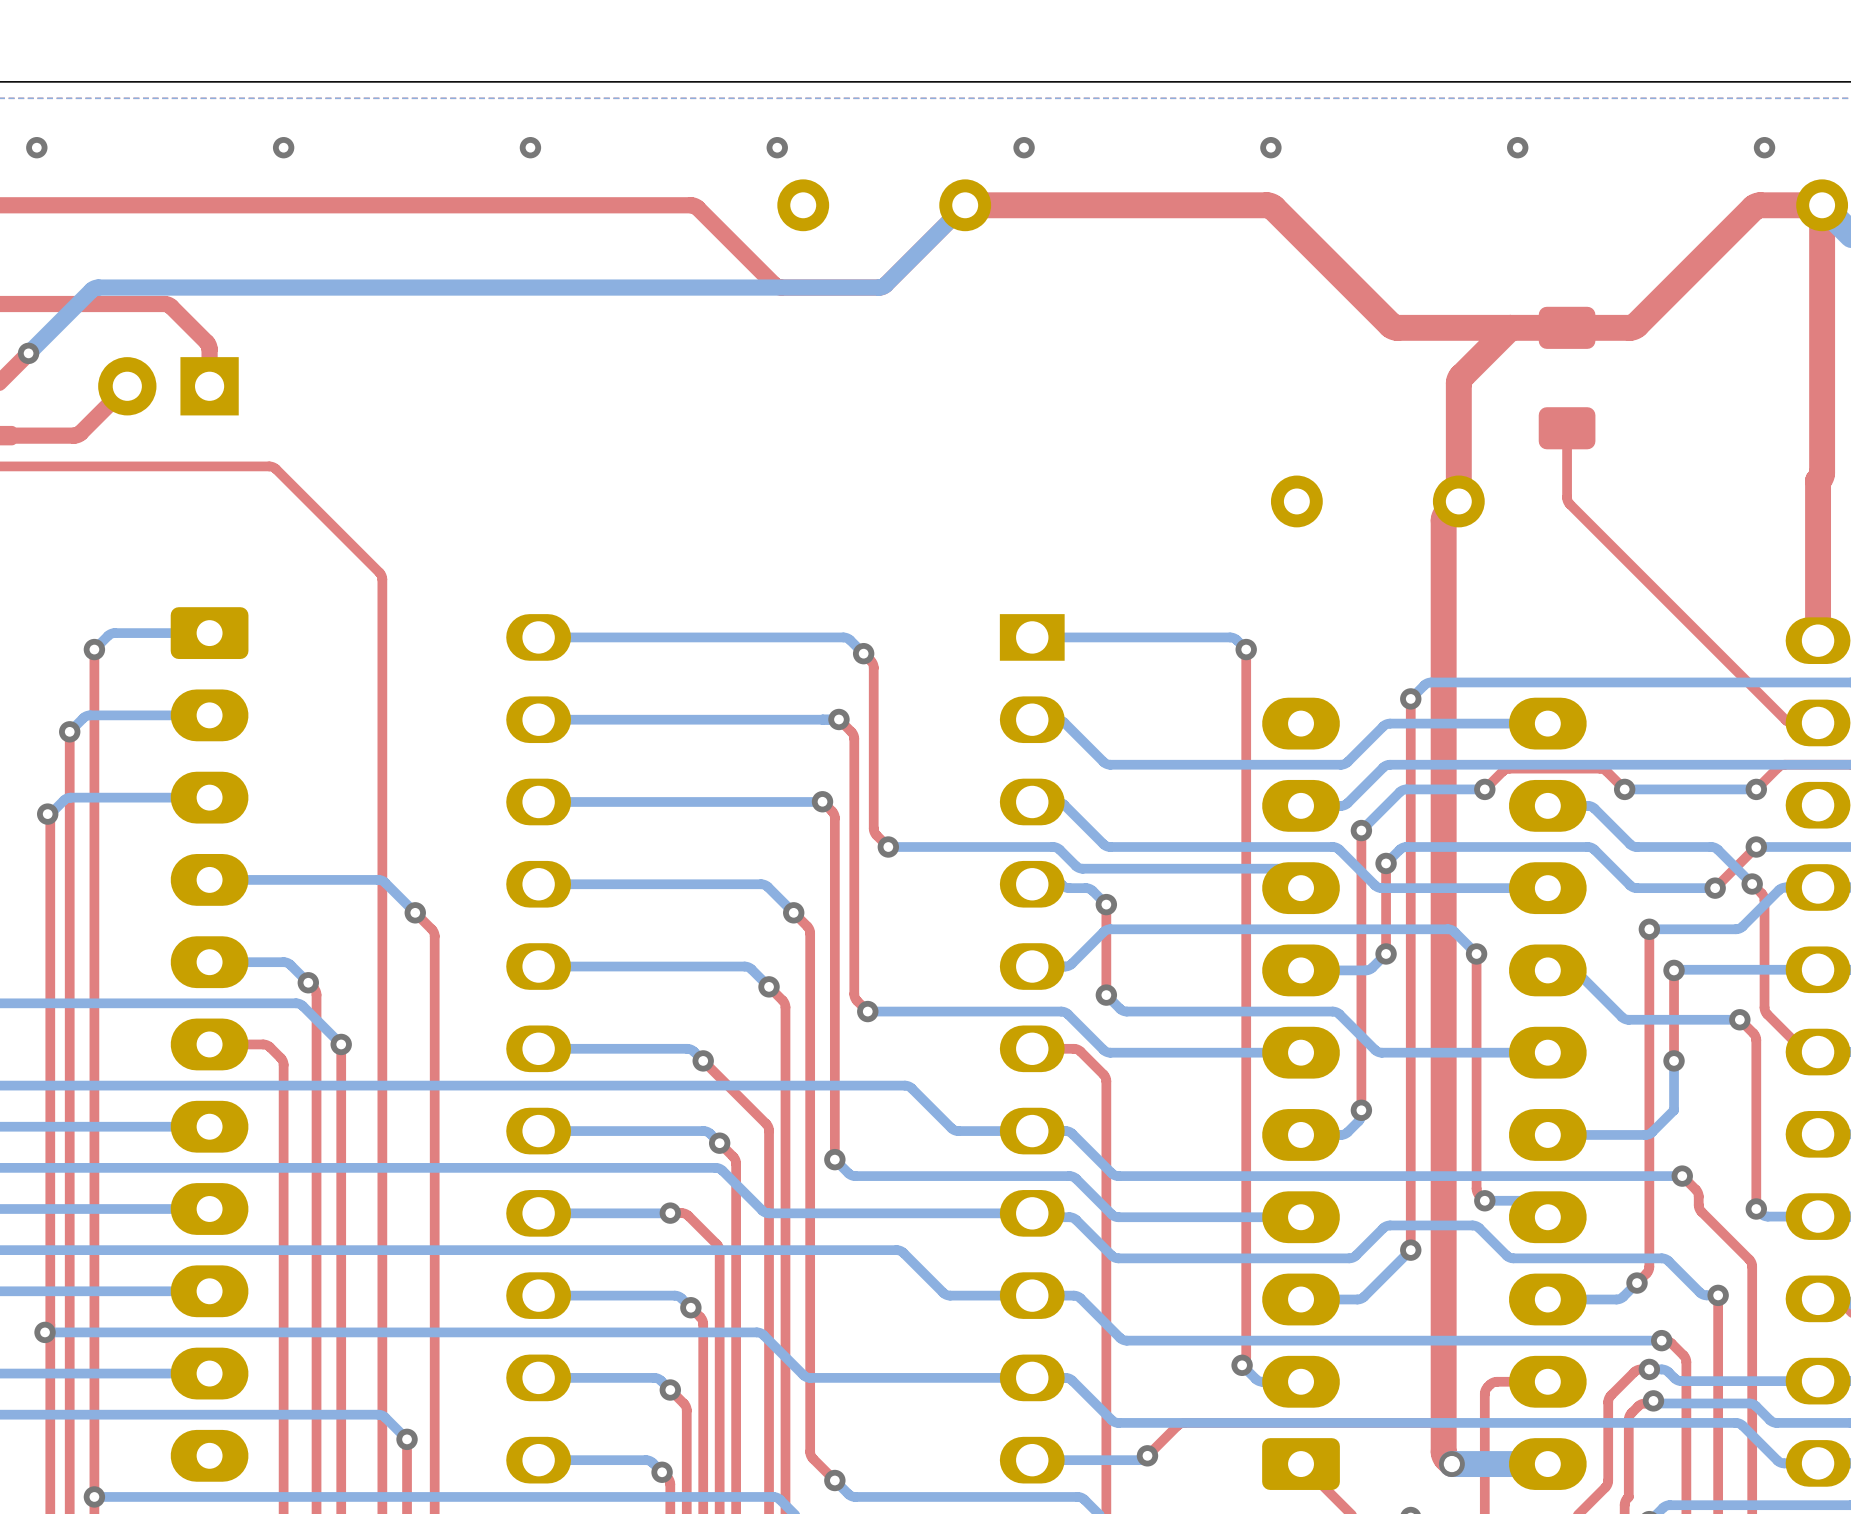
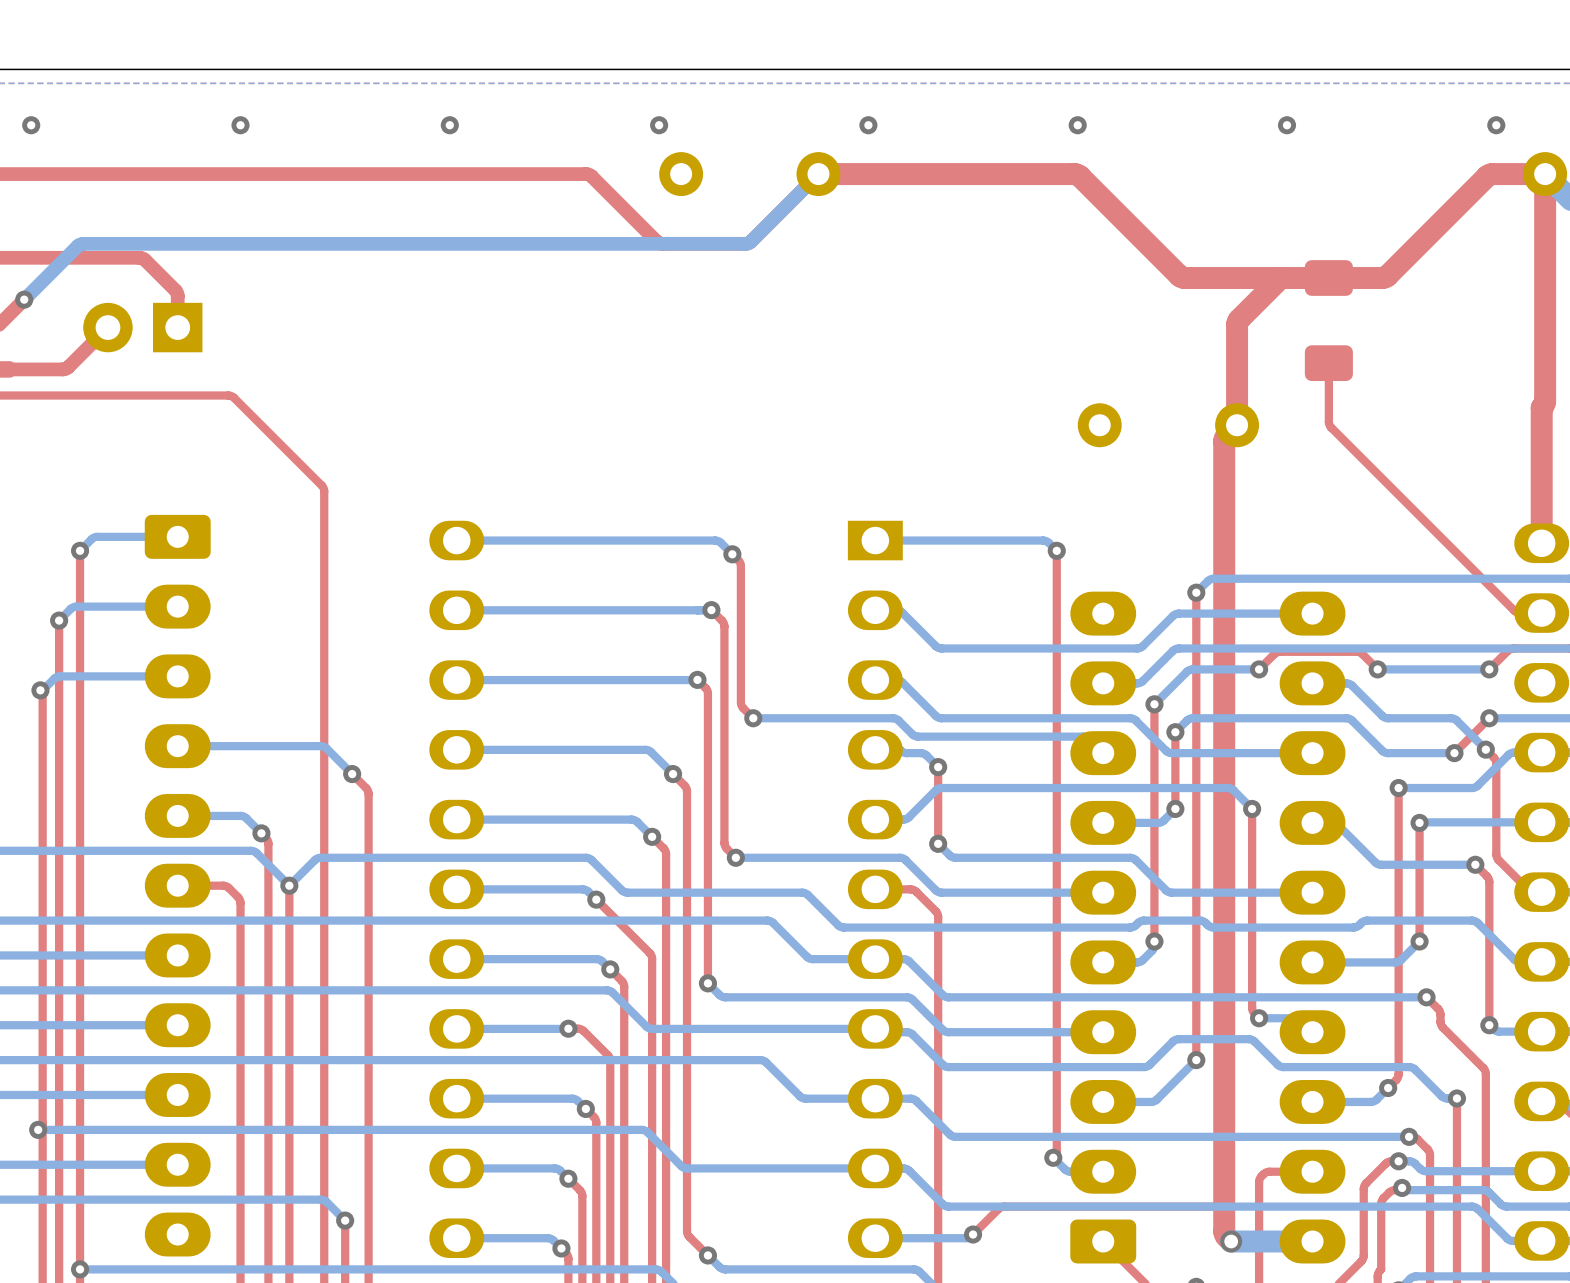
bottom track: none -> (289, 885) (314, 860) (319, 857) (586, 857) (591, 859) (625, 892) (803, 892) (838, 925) (843, 927) (1130, 927) (1143, 920) (1199, 920) (1213, 927) (1353, 927) (1366, 920) (1472, 920) (1477, 922) (1516, 960) (1541, 961)
top track: none -> (1419, 899) (1419, 941)
bottom track: (1674, 1060) (1674, 1110) -> none
via position: (1674, 1060) -> (1419, 941)

